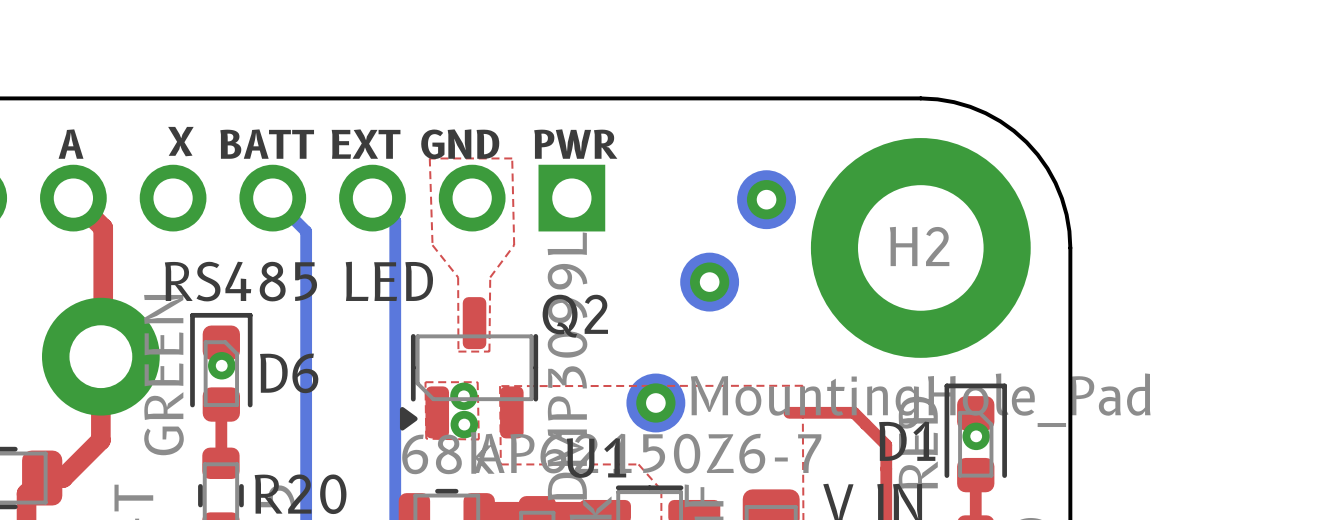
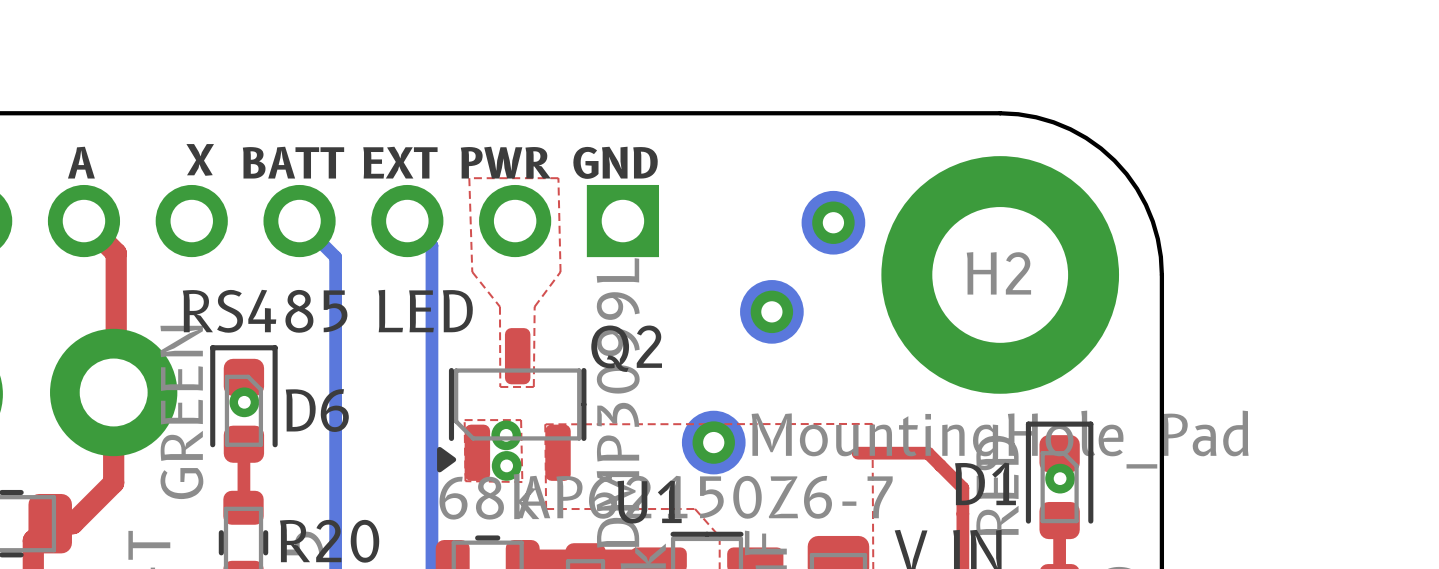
text: GND (460, 144) -> PWR (505, 162)
text: PWR (575, 144) -> GND (615, 162)

